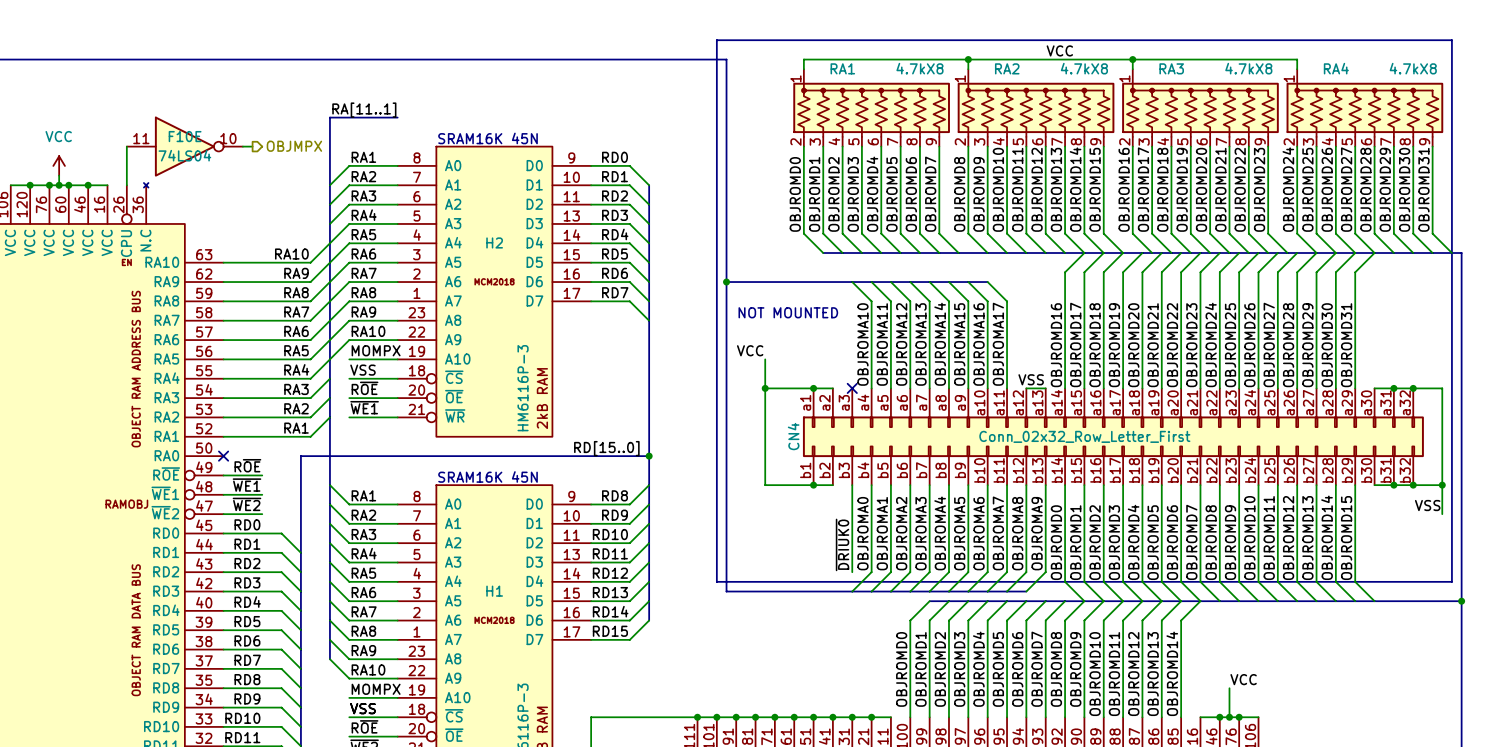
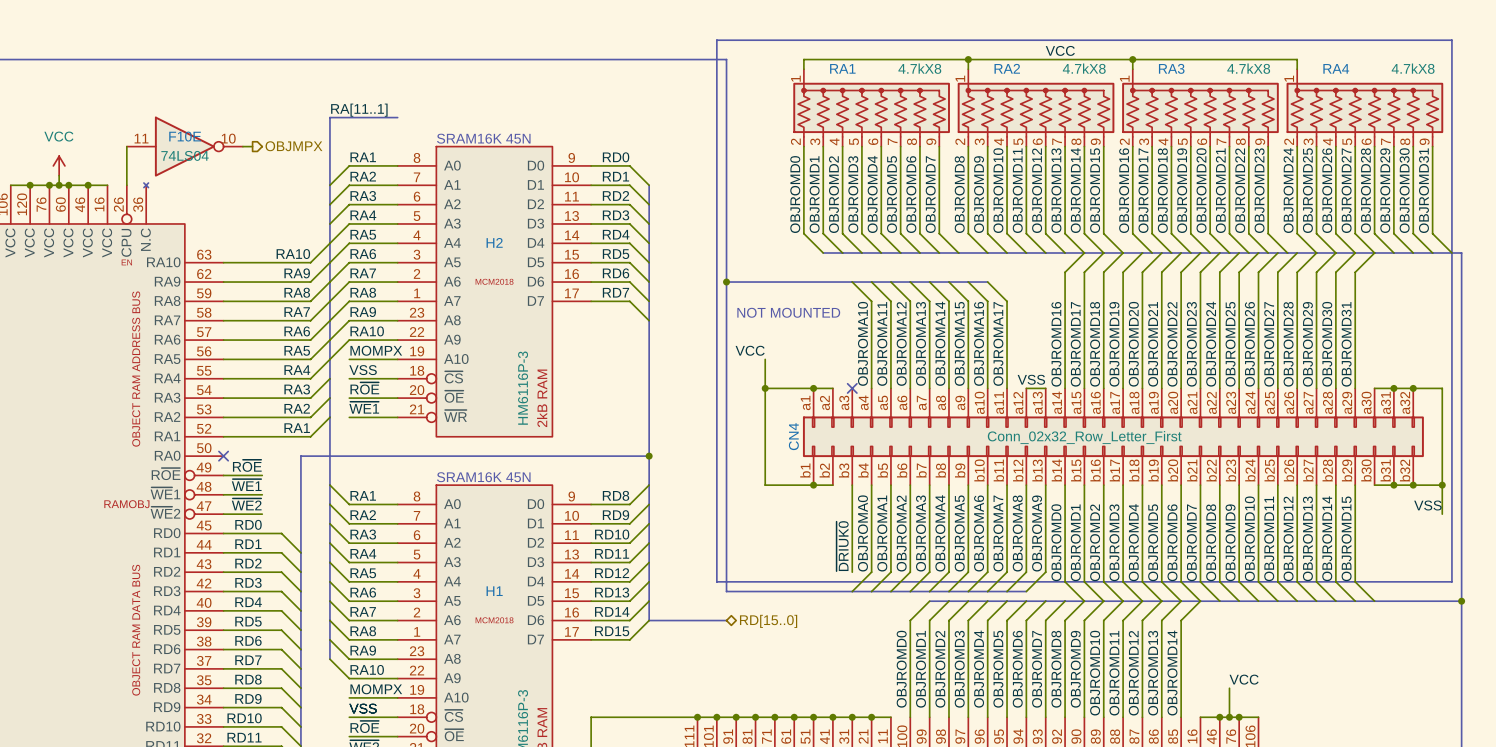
label: RD[15..0] (606, 448) -> none
bus: none -> (649, 620) (726, 620)
hierarchical label: none -> RD[15..0] (768, 621)

